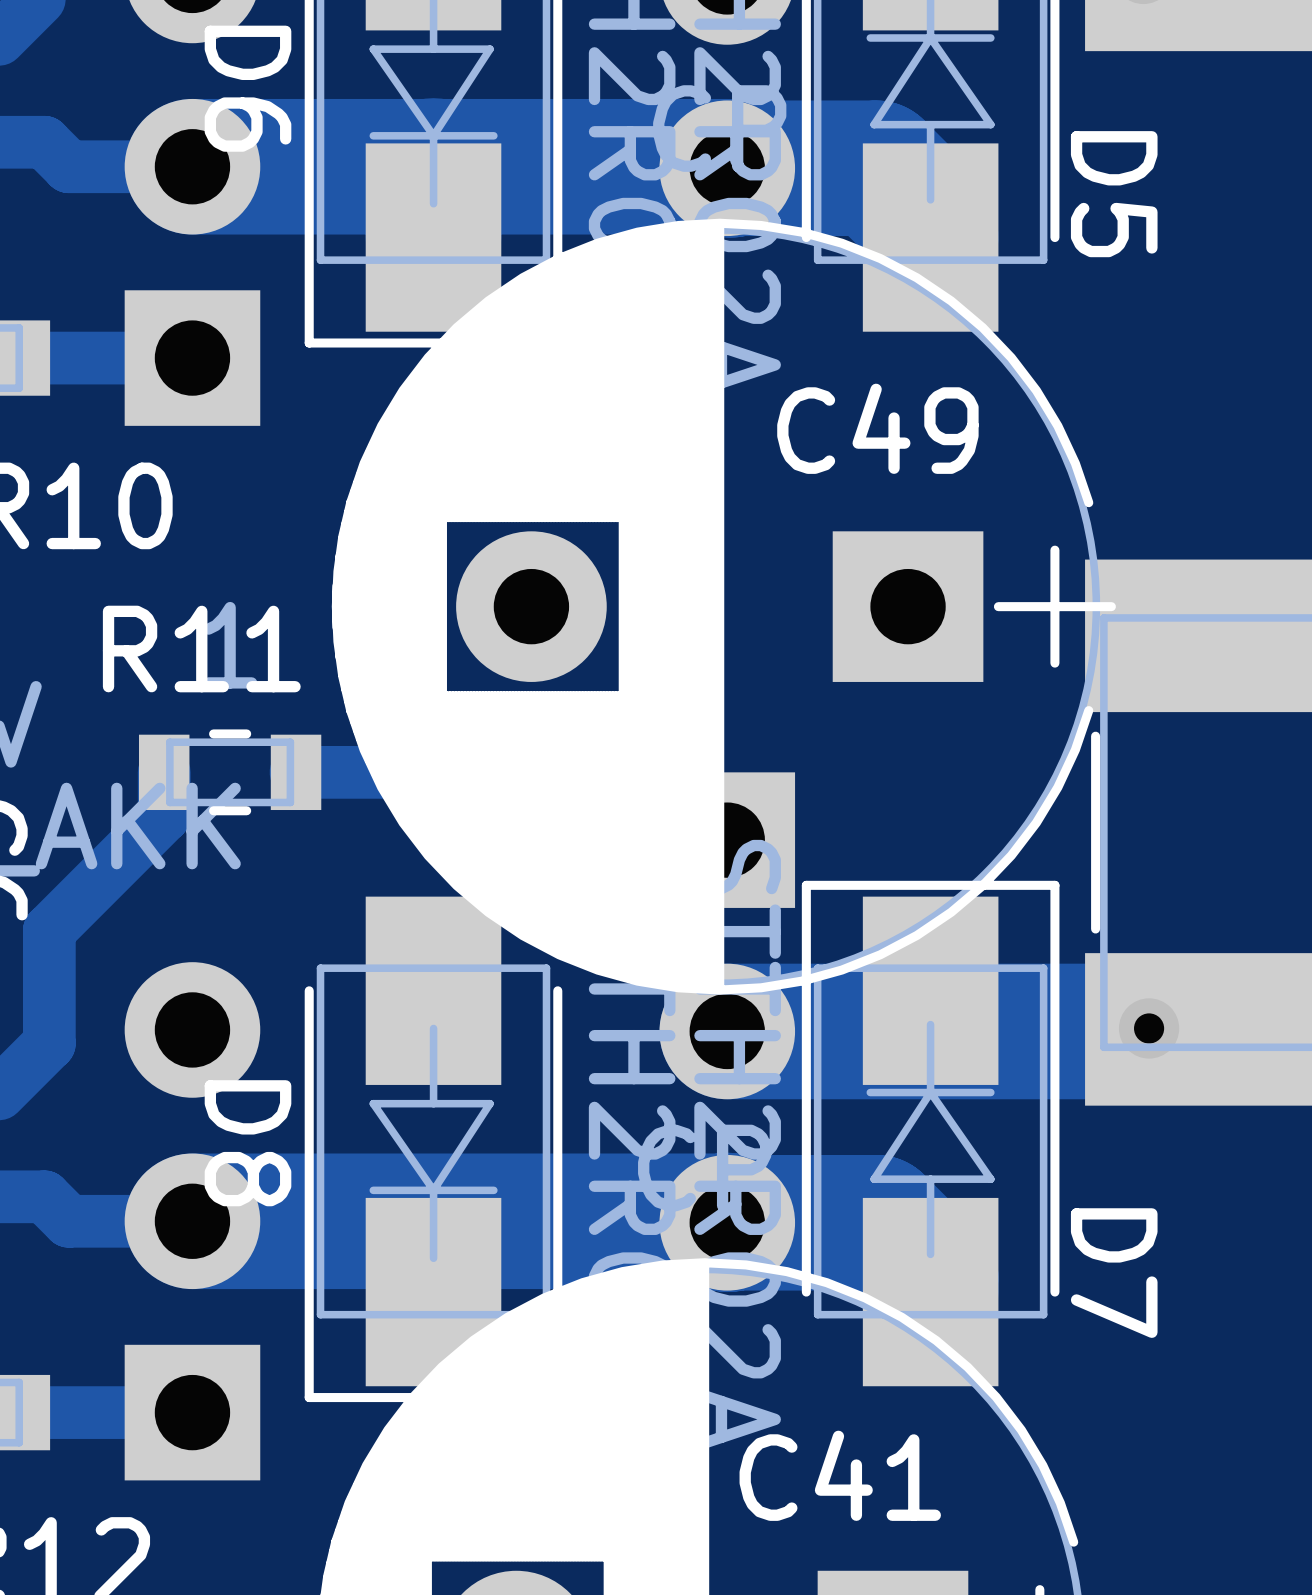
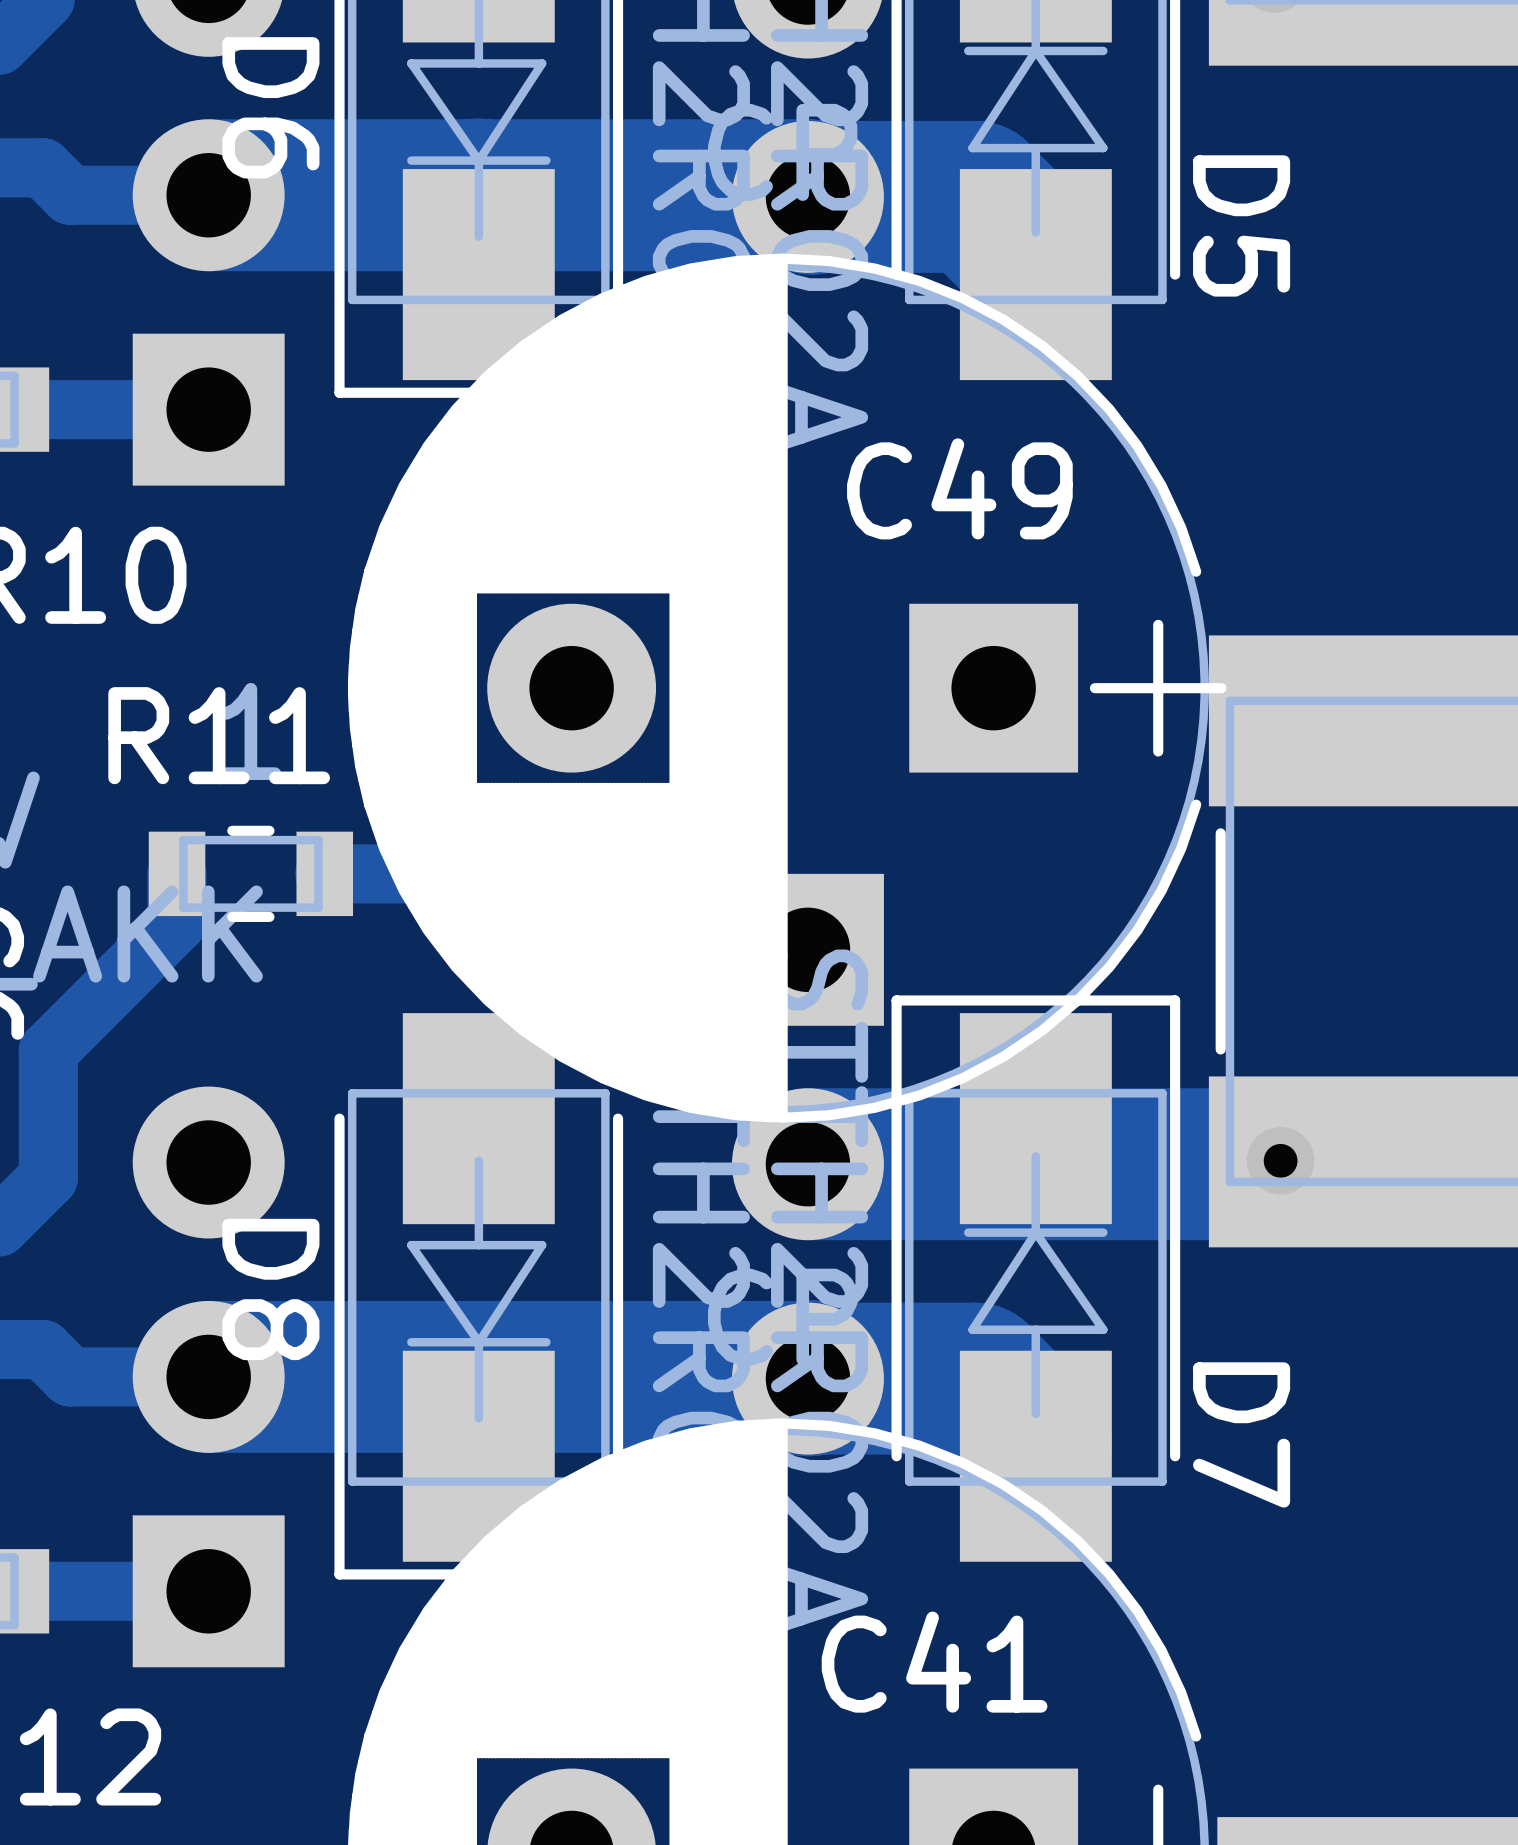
C49 position: (723, 606) -> (787, 688)

